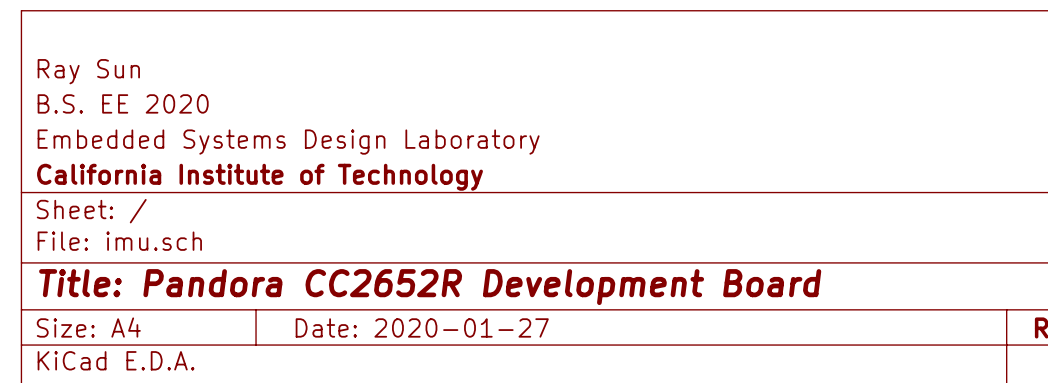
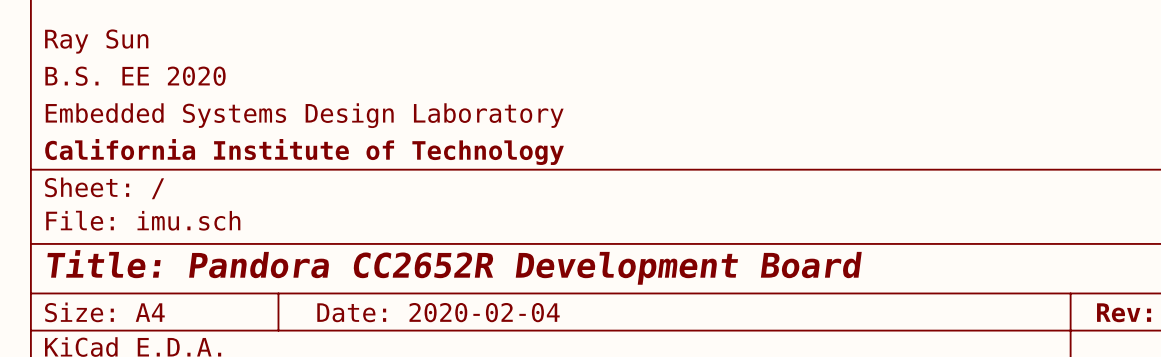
title block: Date: 2020-01-27 (422, 327) -> Date: 2020-02-04 (438, 312)

